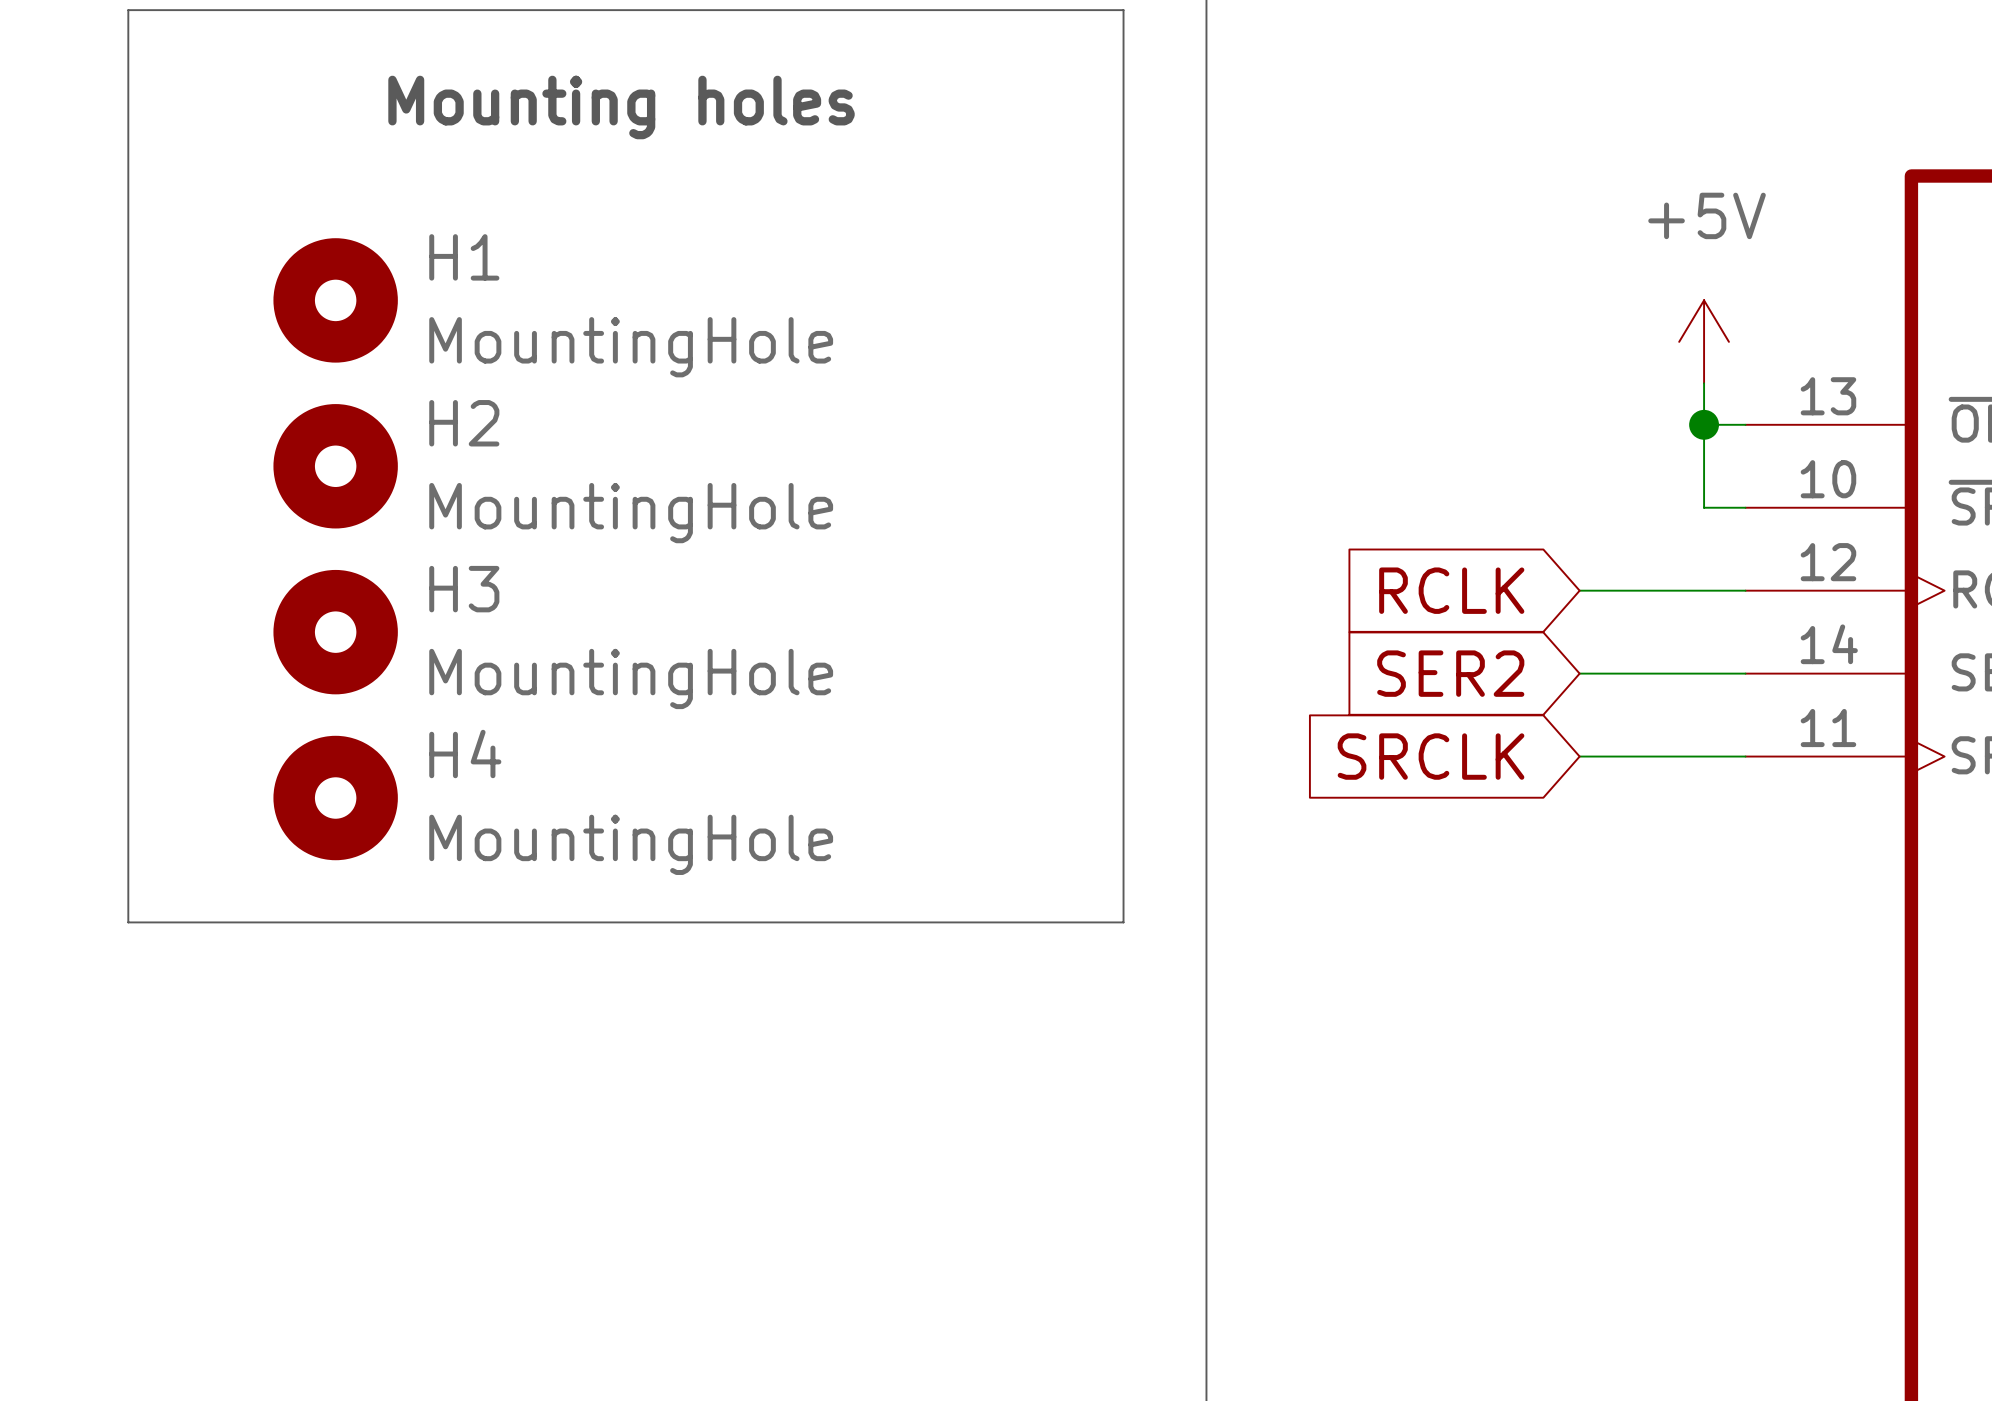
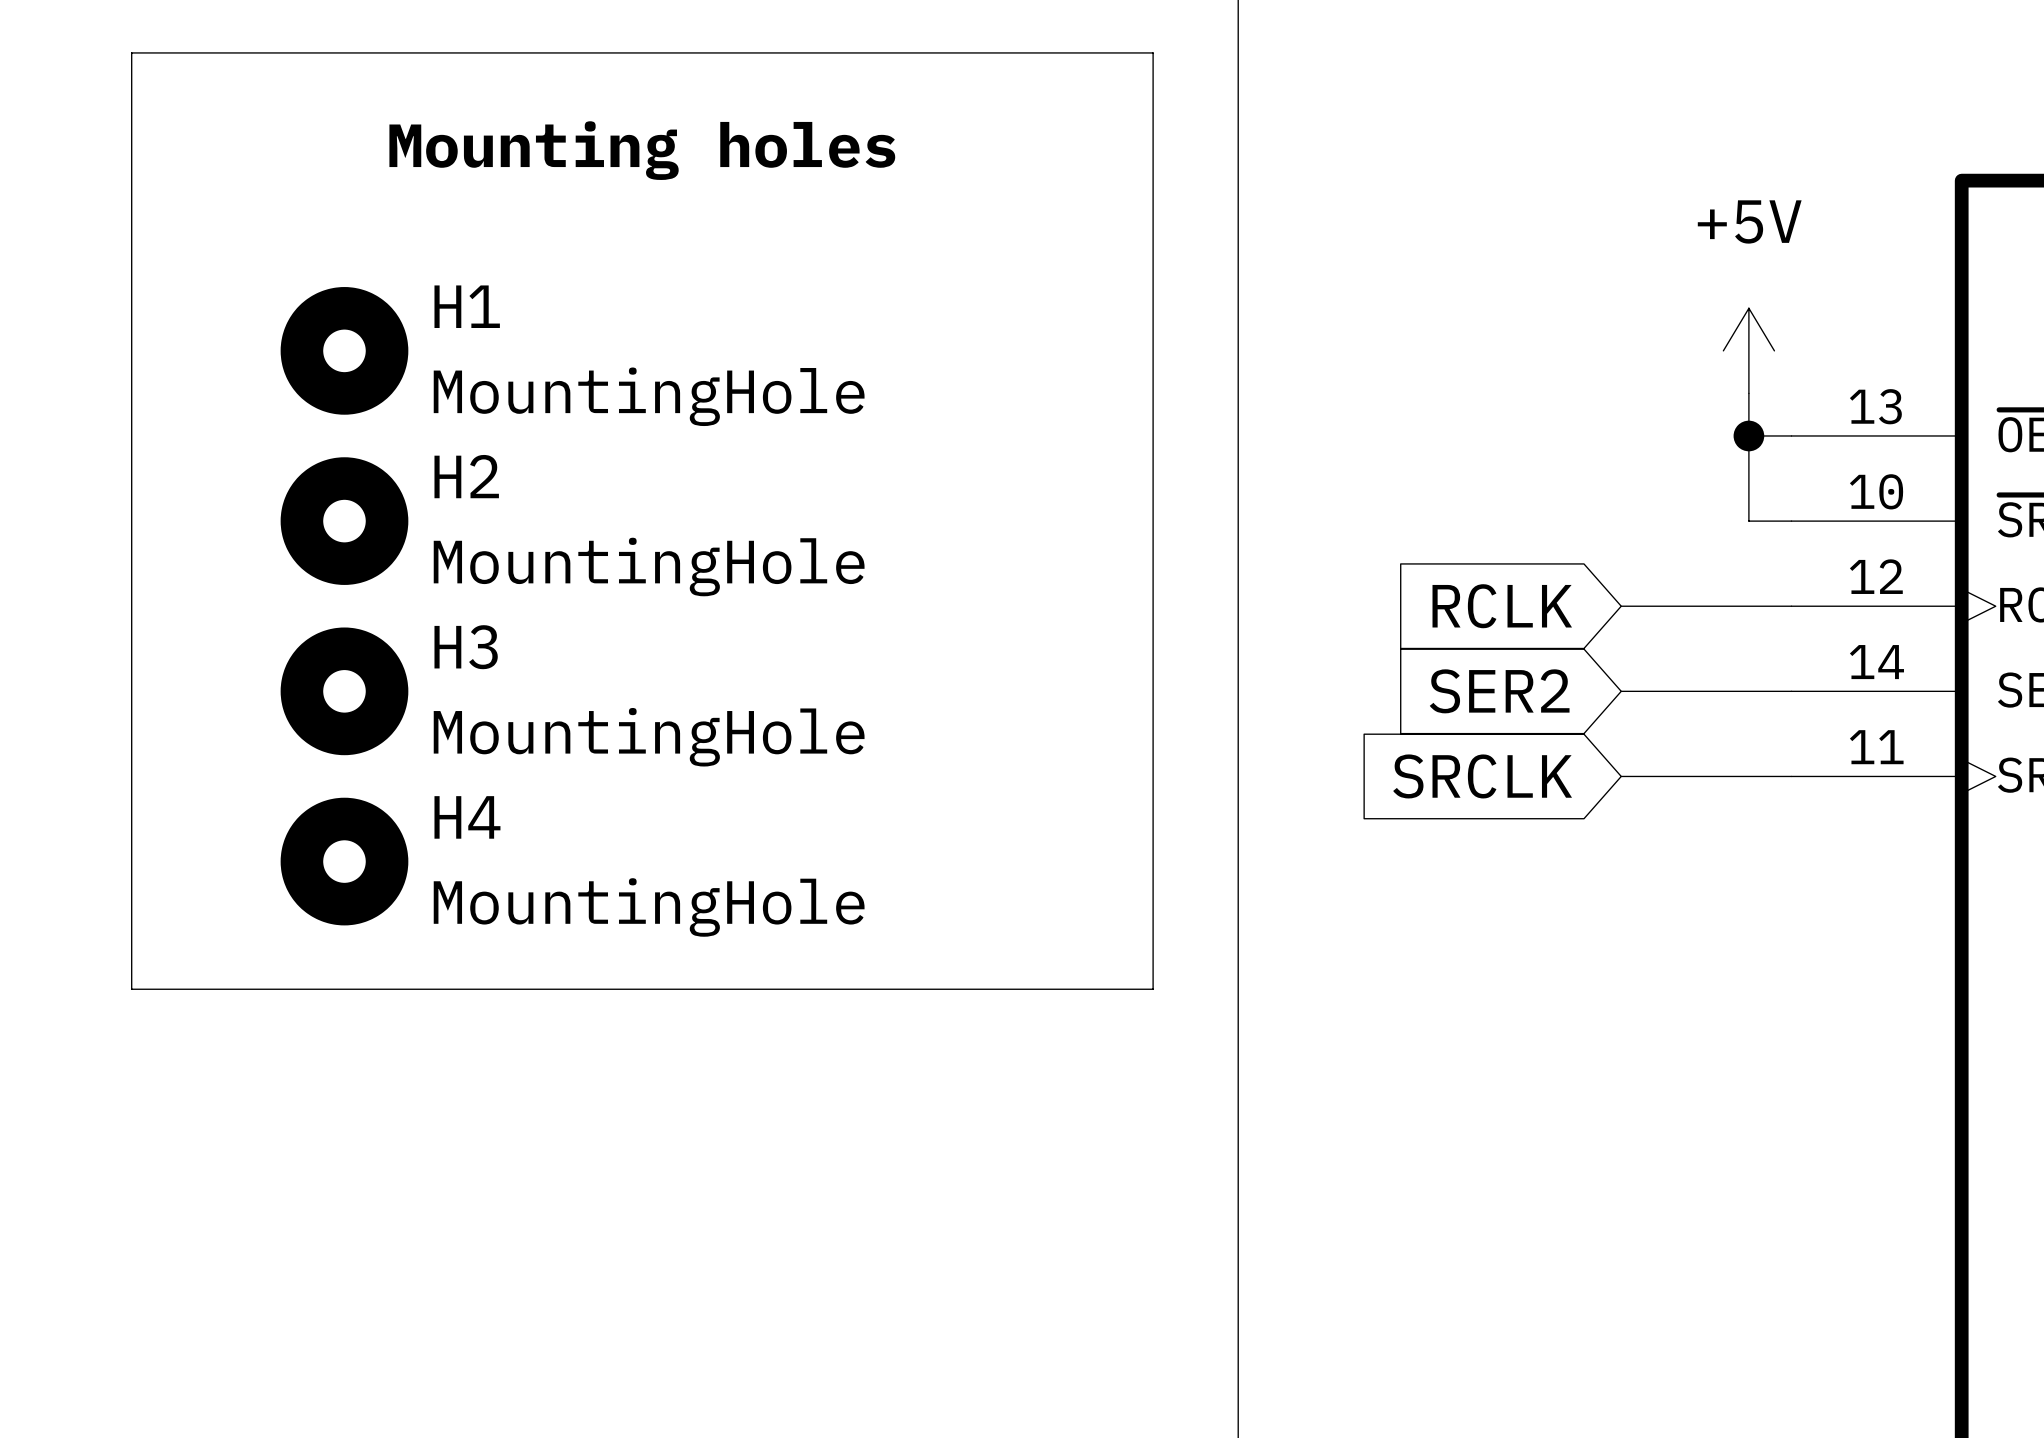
line: (128, 51) (128, 10) (1123, 10) (1123, 51) -> (131, 52) (1153, 52)
text position: Mounting holes (621, 107) -> Mounting holes (642, 150)
H1 position: (335, 300) -> (344, 350)
H2 position: (335, 466) -> (344, 521)
H3 position: (335, 632) -> (344, 691)
H4 position: (335, 798) -> (344, 861)
line: (128, 922) (1123, 922) -> (131, 946) (131, 989) (1153, 989) (1153, 946)

